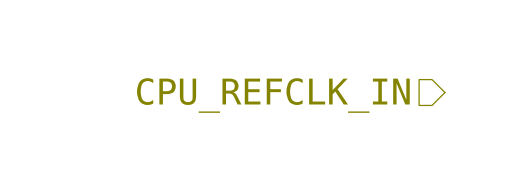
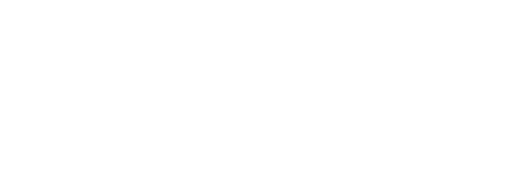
hierarchical label: CPU_REFCLK_IN (273, 95) -> none

